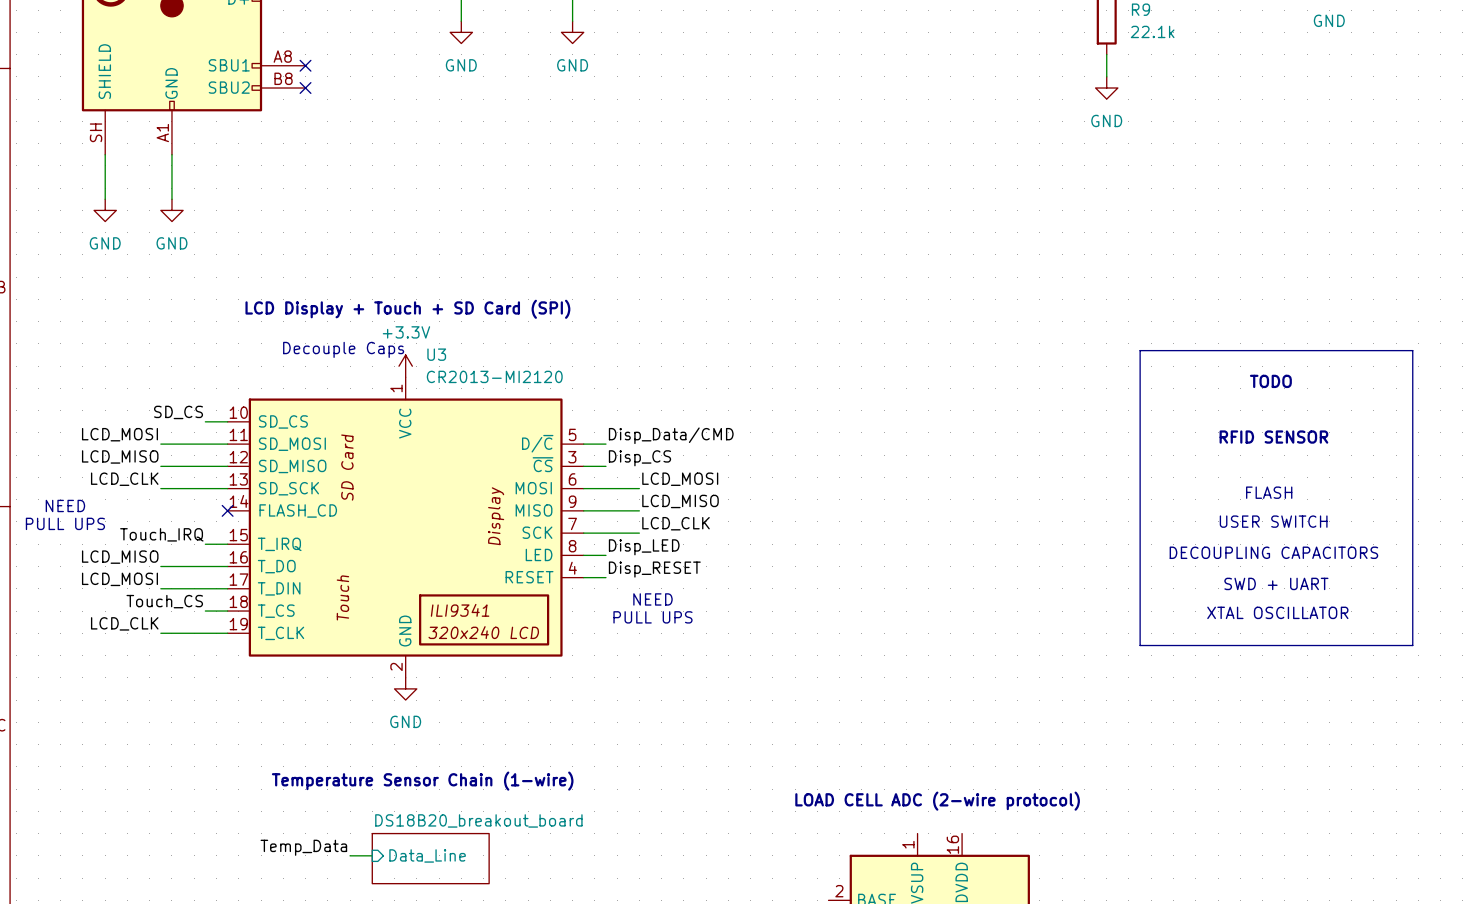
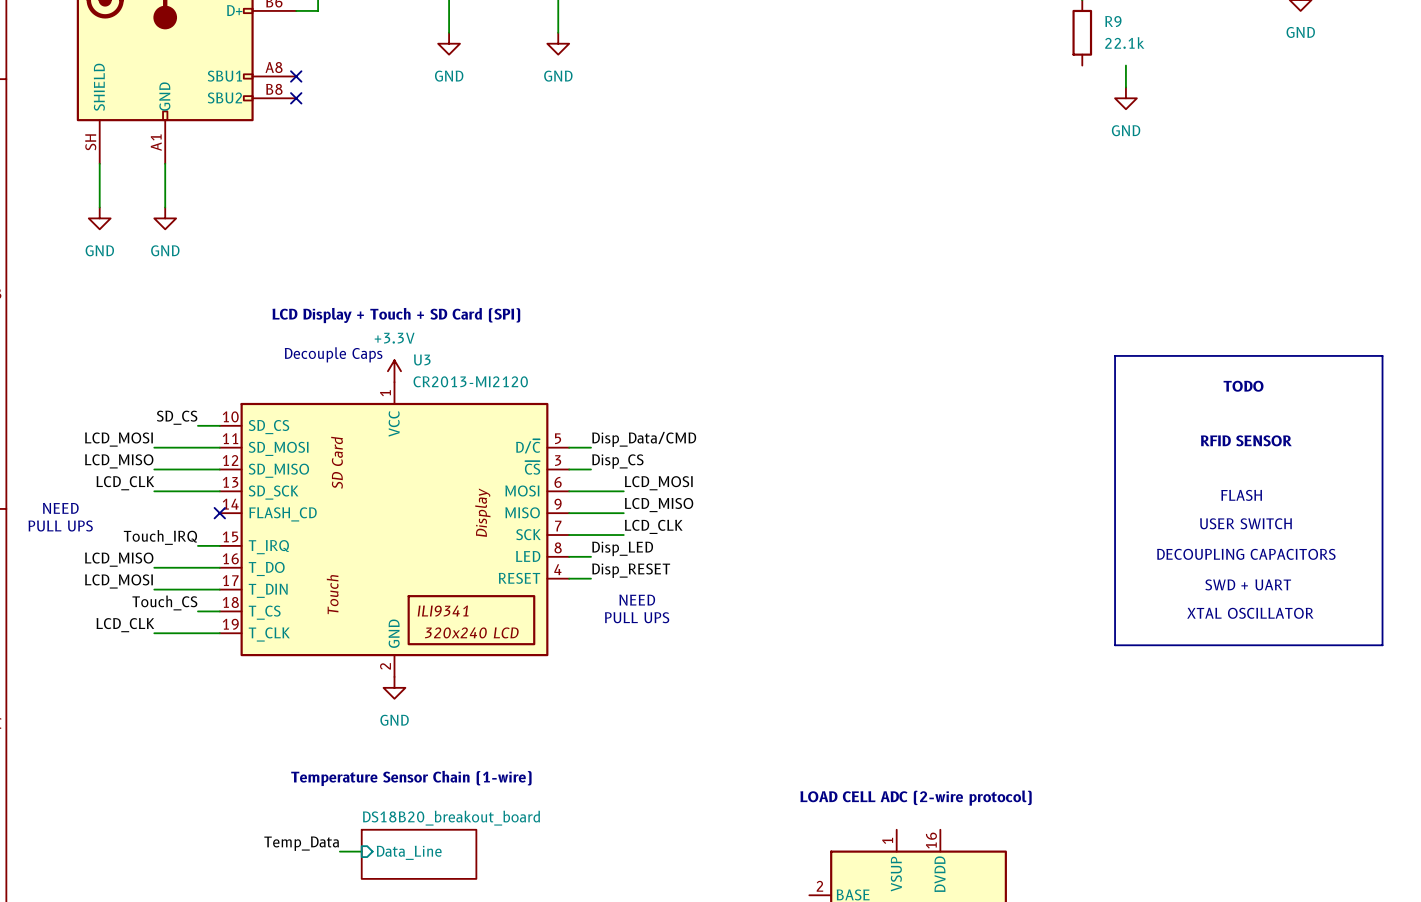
wire: (1106, 54) (1106, 76) -> (1125, 65) (1125, 87)
power symbol position: GND (1106, 88) -> GND (1125, 98)

